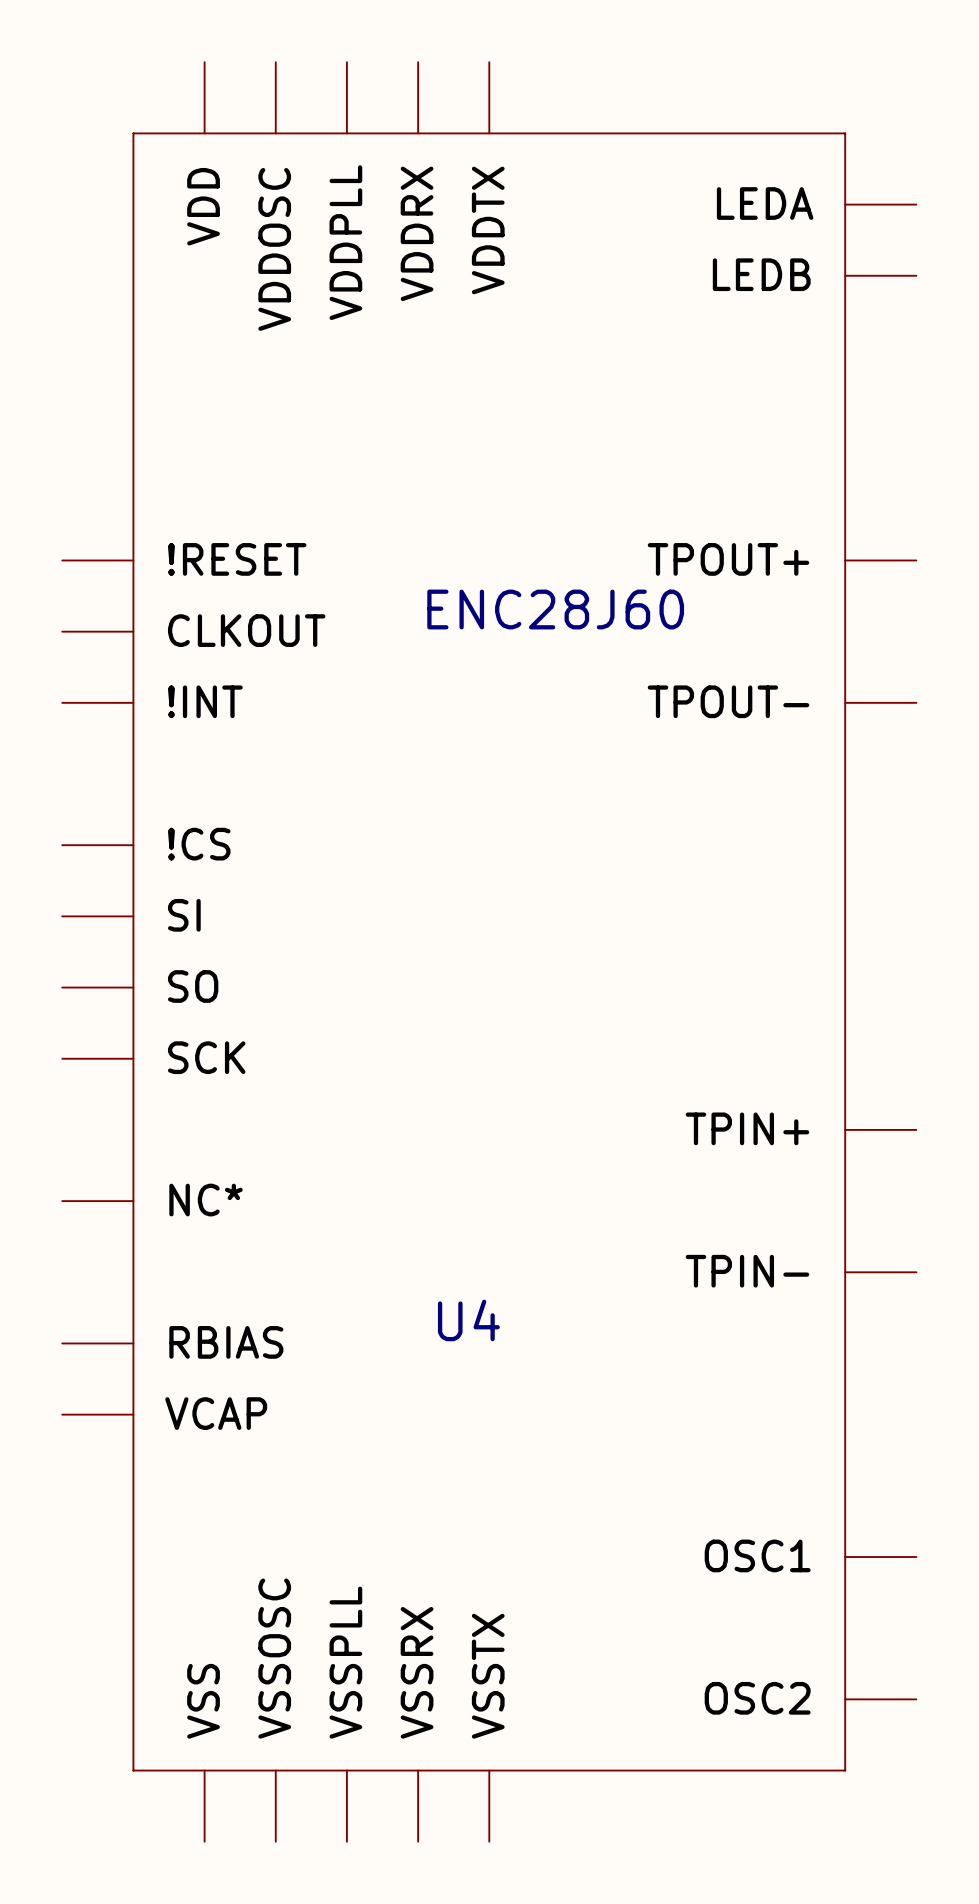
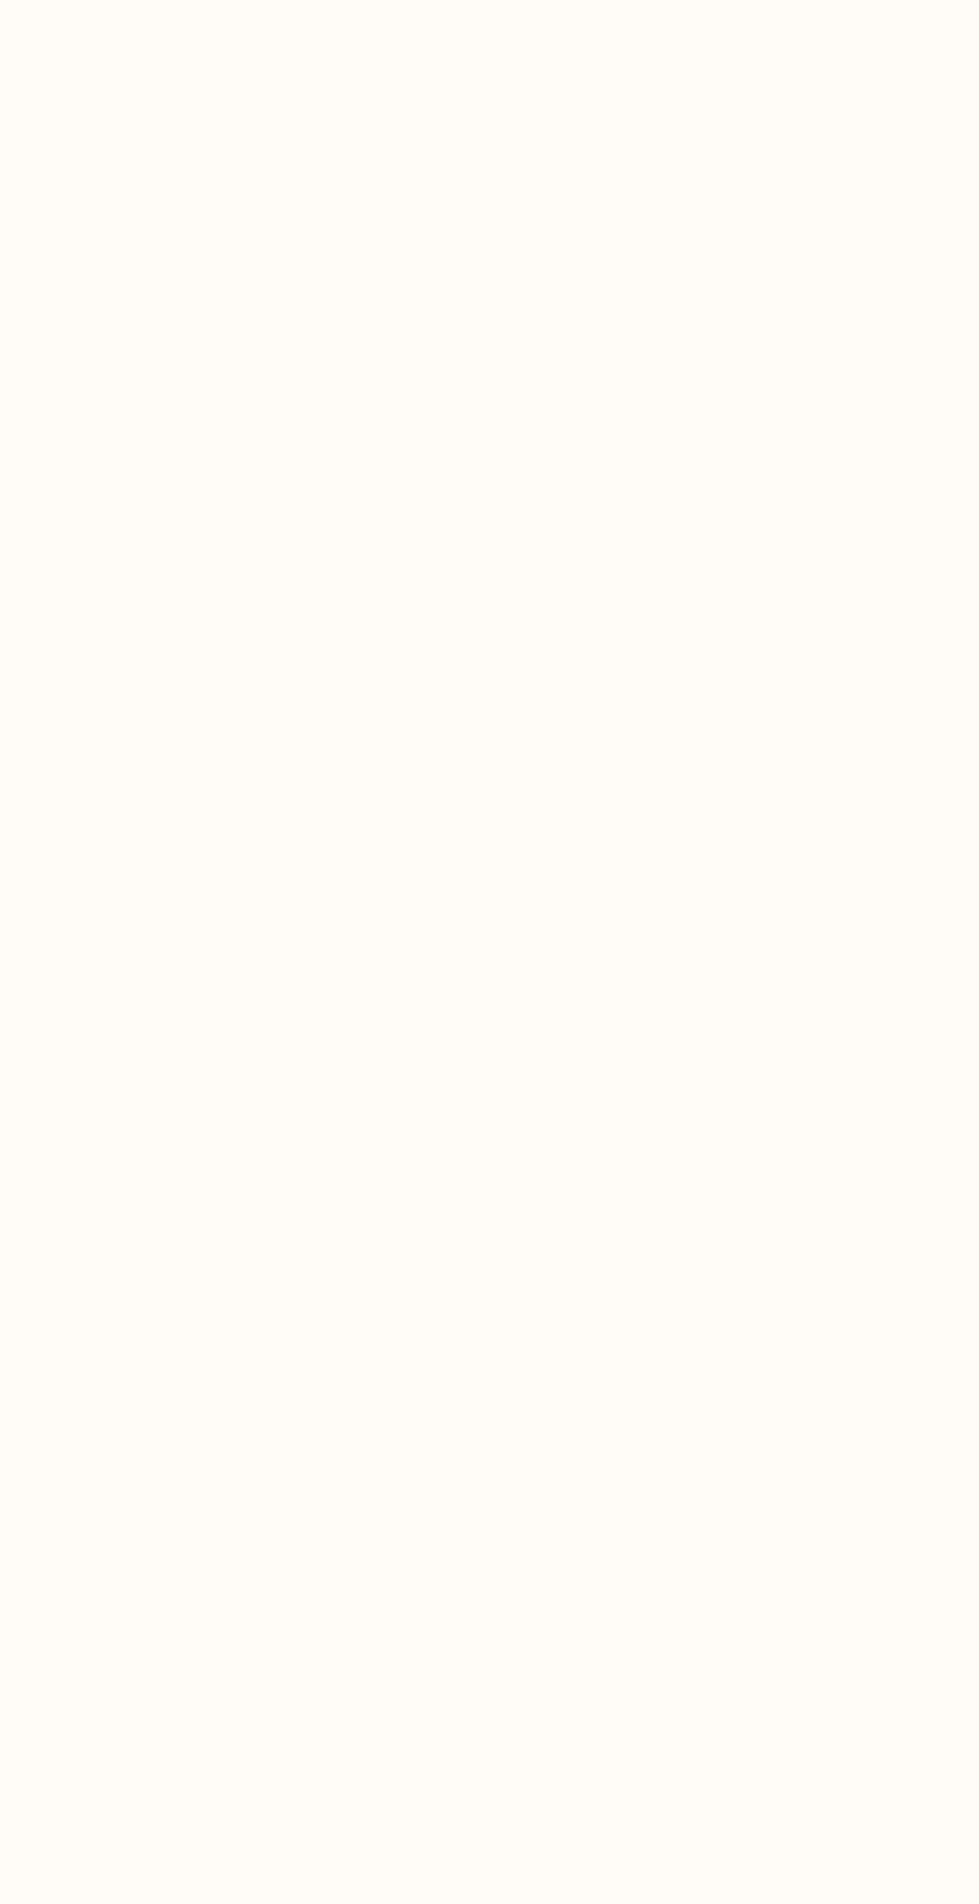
U4: ENC28J60 (489, 951) -> none

